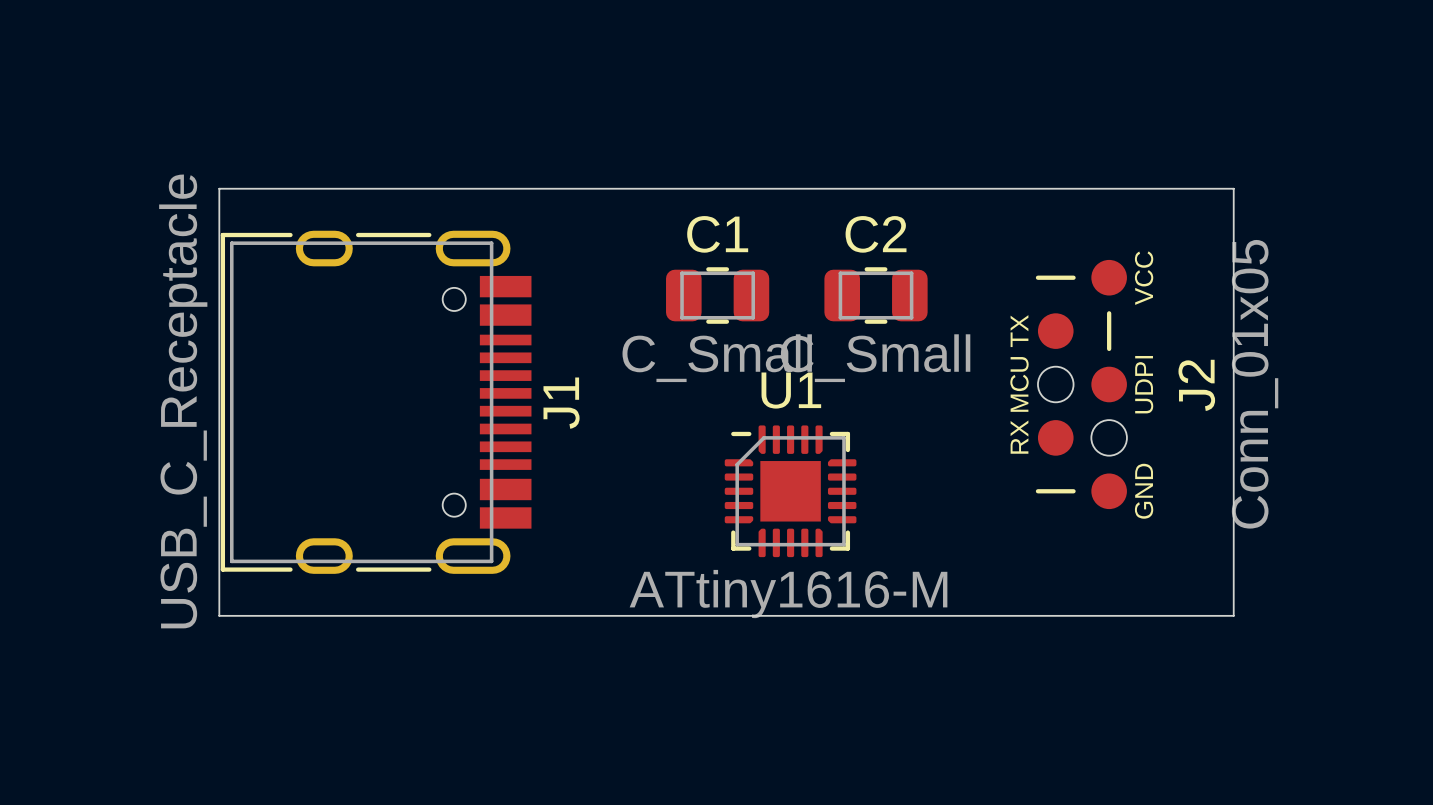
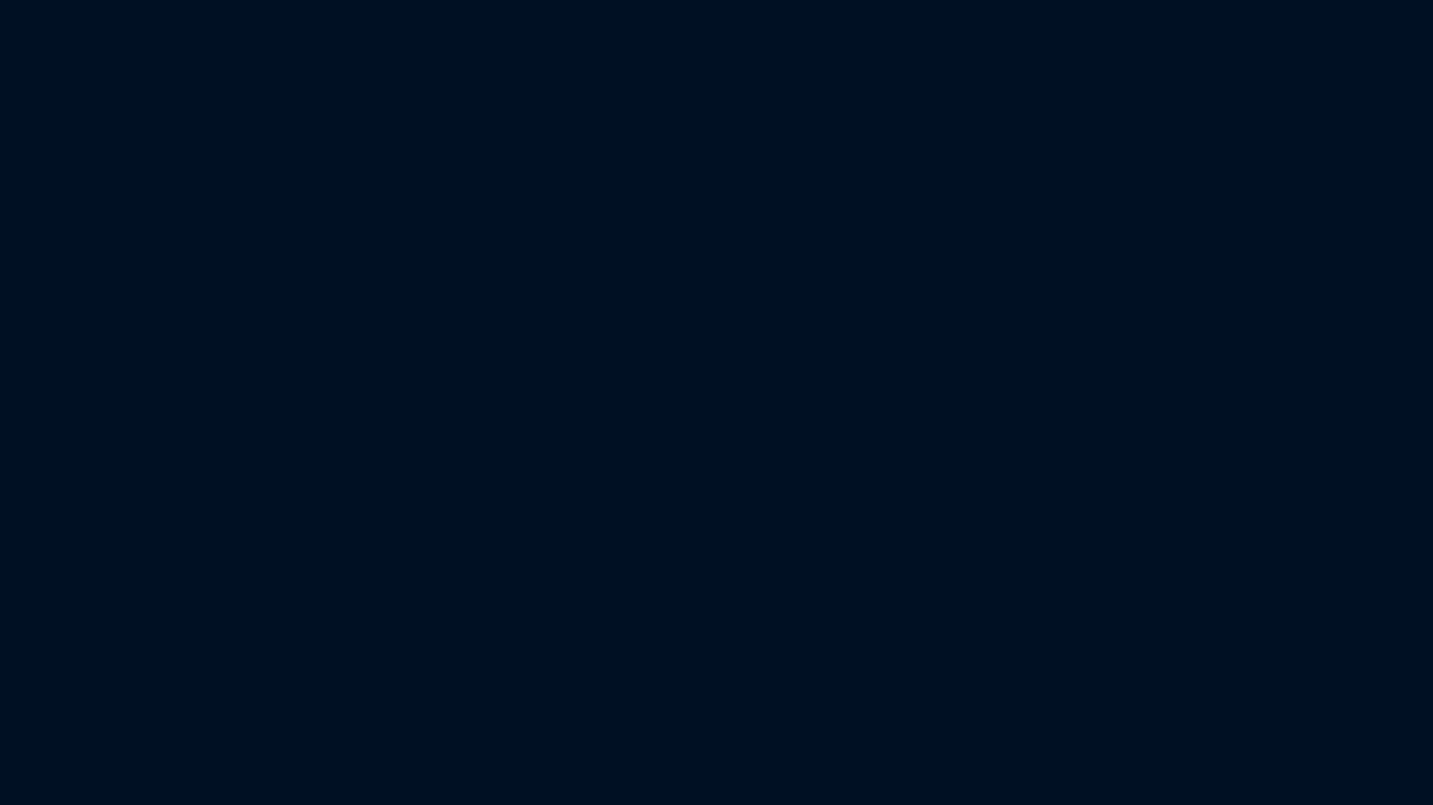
board edge: (219, 188) (219, 615) (1233, 615) (1233, 188) (219, 188) -> none
C1: C_Small (717, 295) -> none
C2: C_Small (876, 295) -> none
J2: Conn_01x05 (1081, 384) -> none
J1: USB_C_Receptacle (376, 402) -> none
U1: ATtiny1616-M (790, 491) -> none

